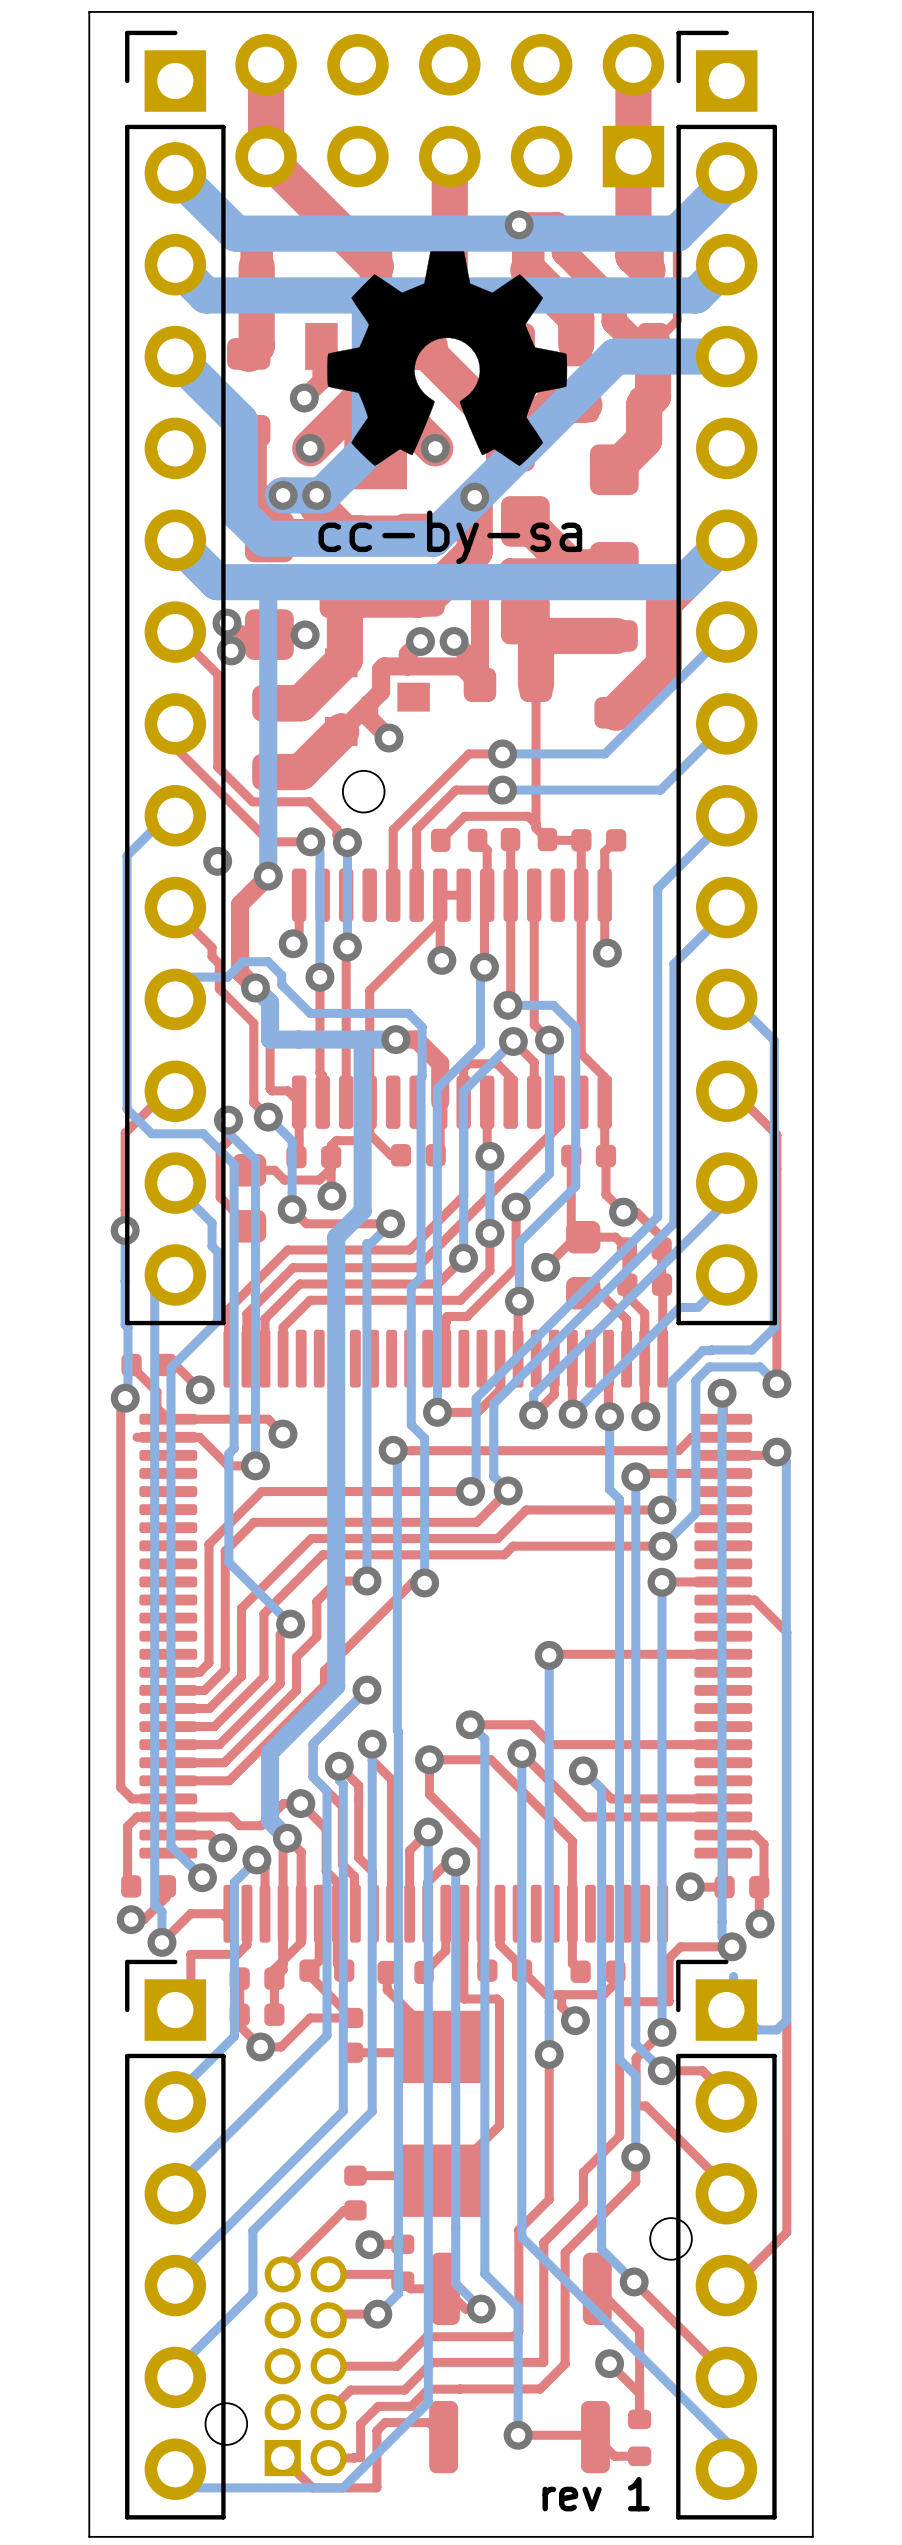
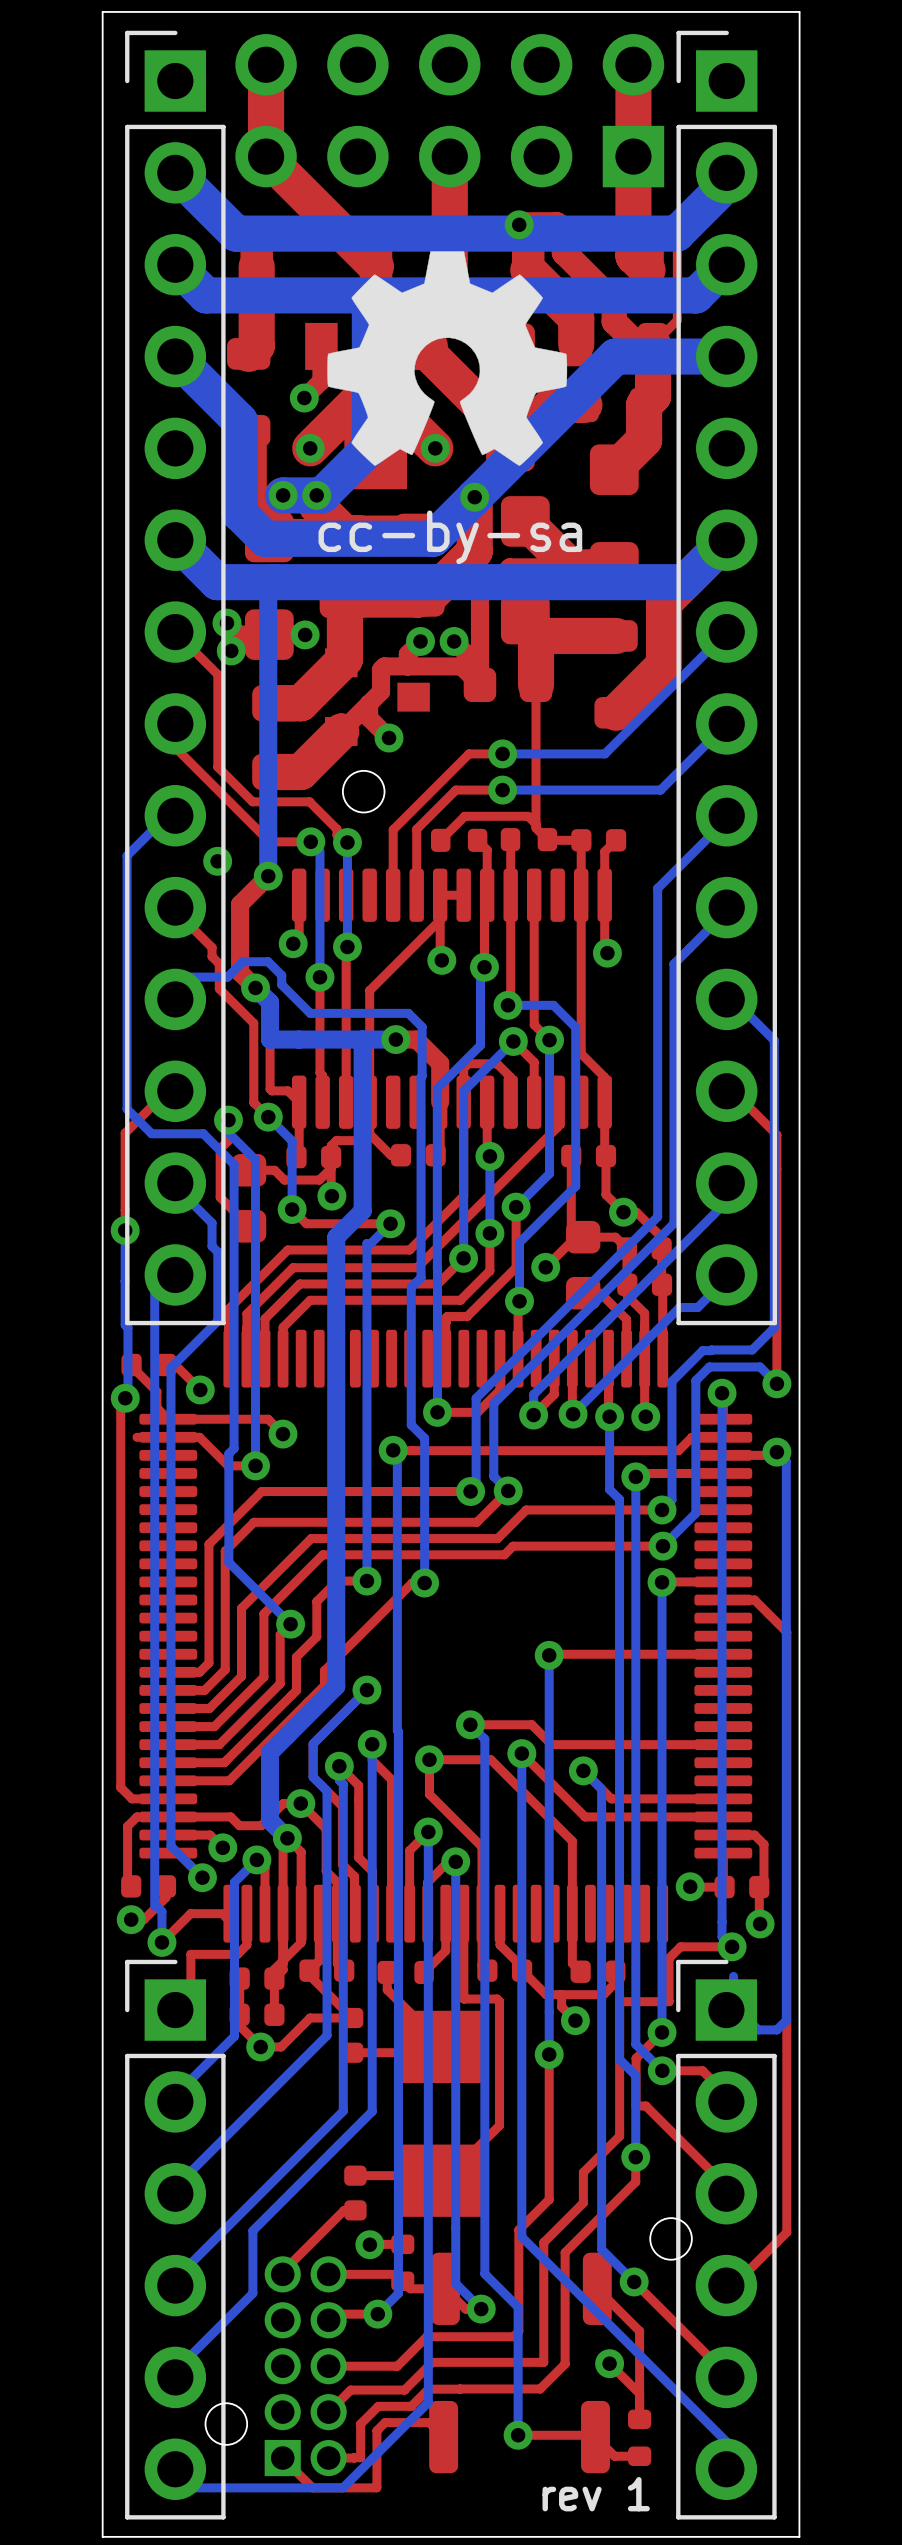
board edge: (102, 11) (89, 11) (89, 2536) (102, 2536) -> (102, 11) (102, 2536)
board edge: (799, 11) (812, 11) (812, 2536) (799, 2536) -> (799, 11) (799, 2536)

